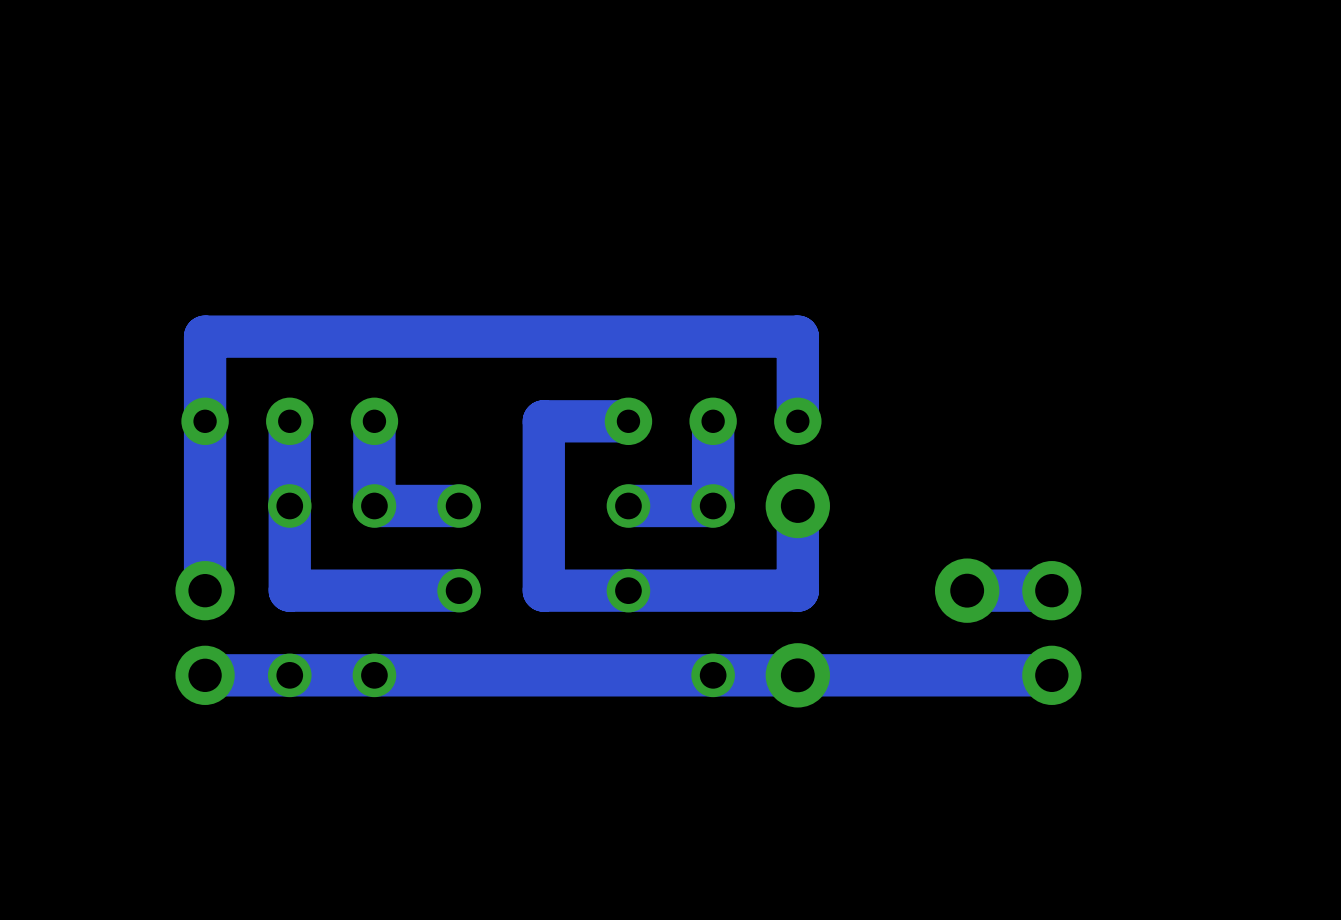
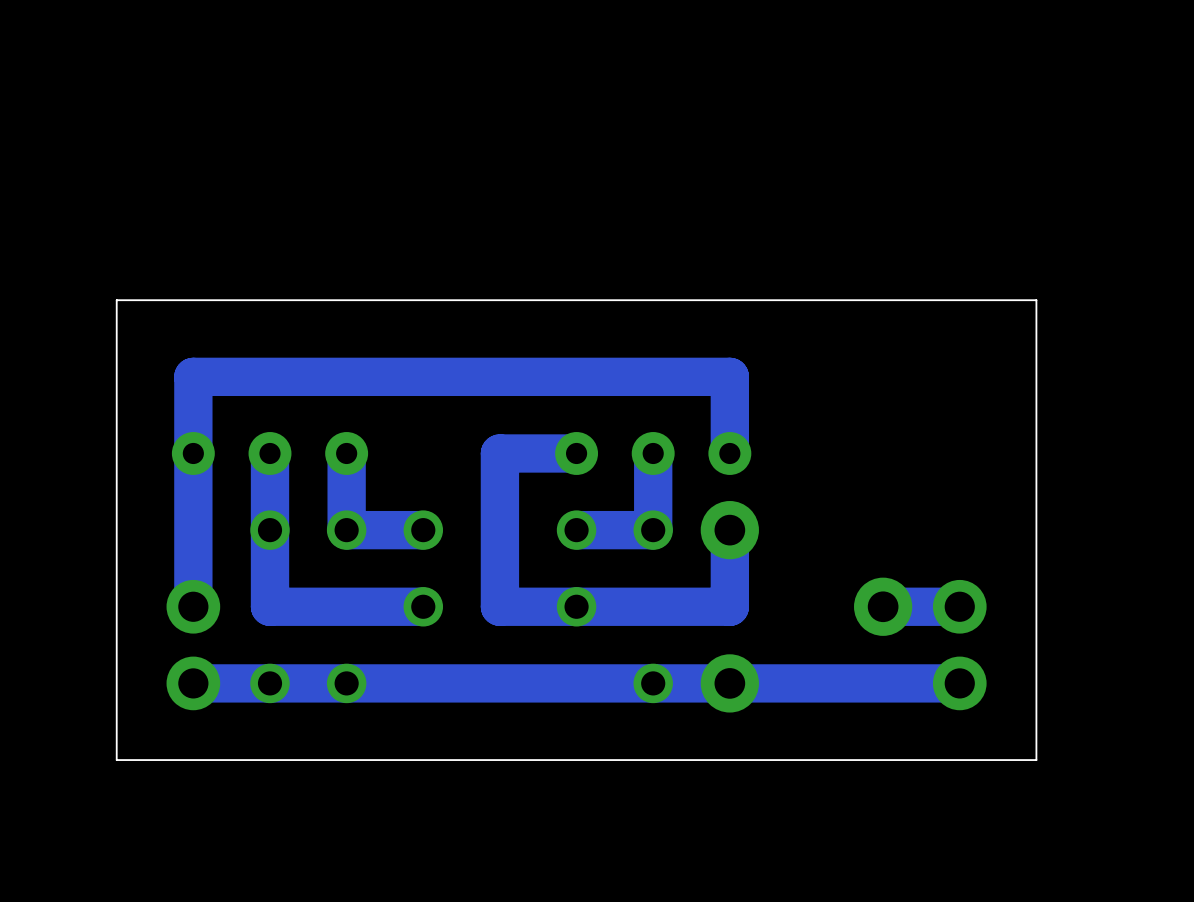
board edge: none -> (1036, 300) (1036, 760) (116, 760) (116, 300) (1036, 300)

